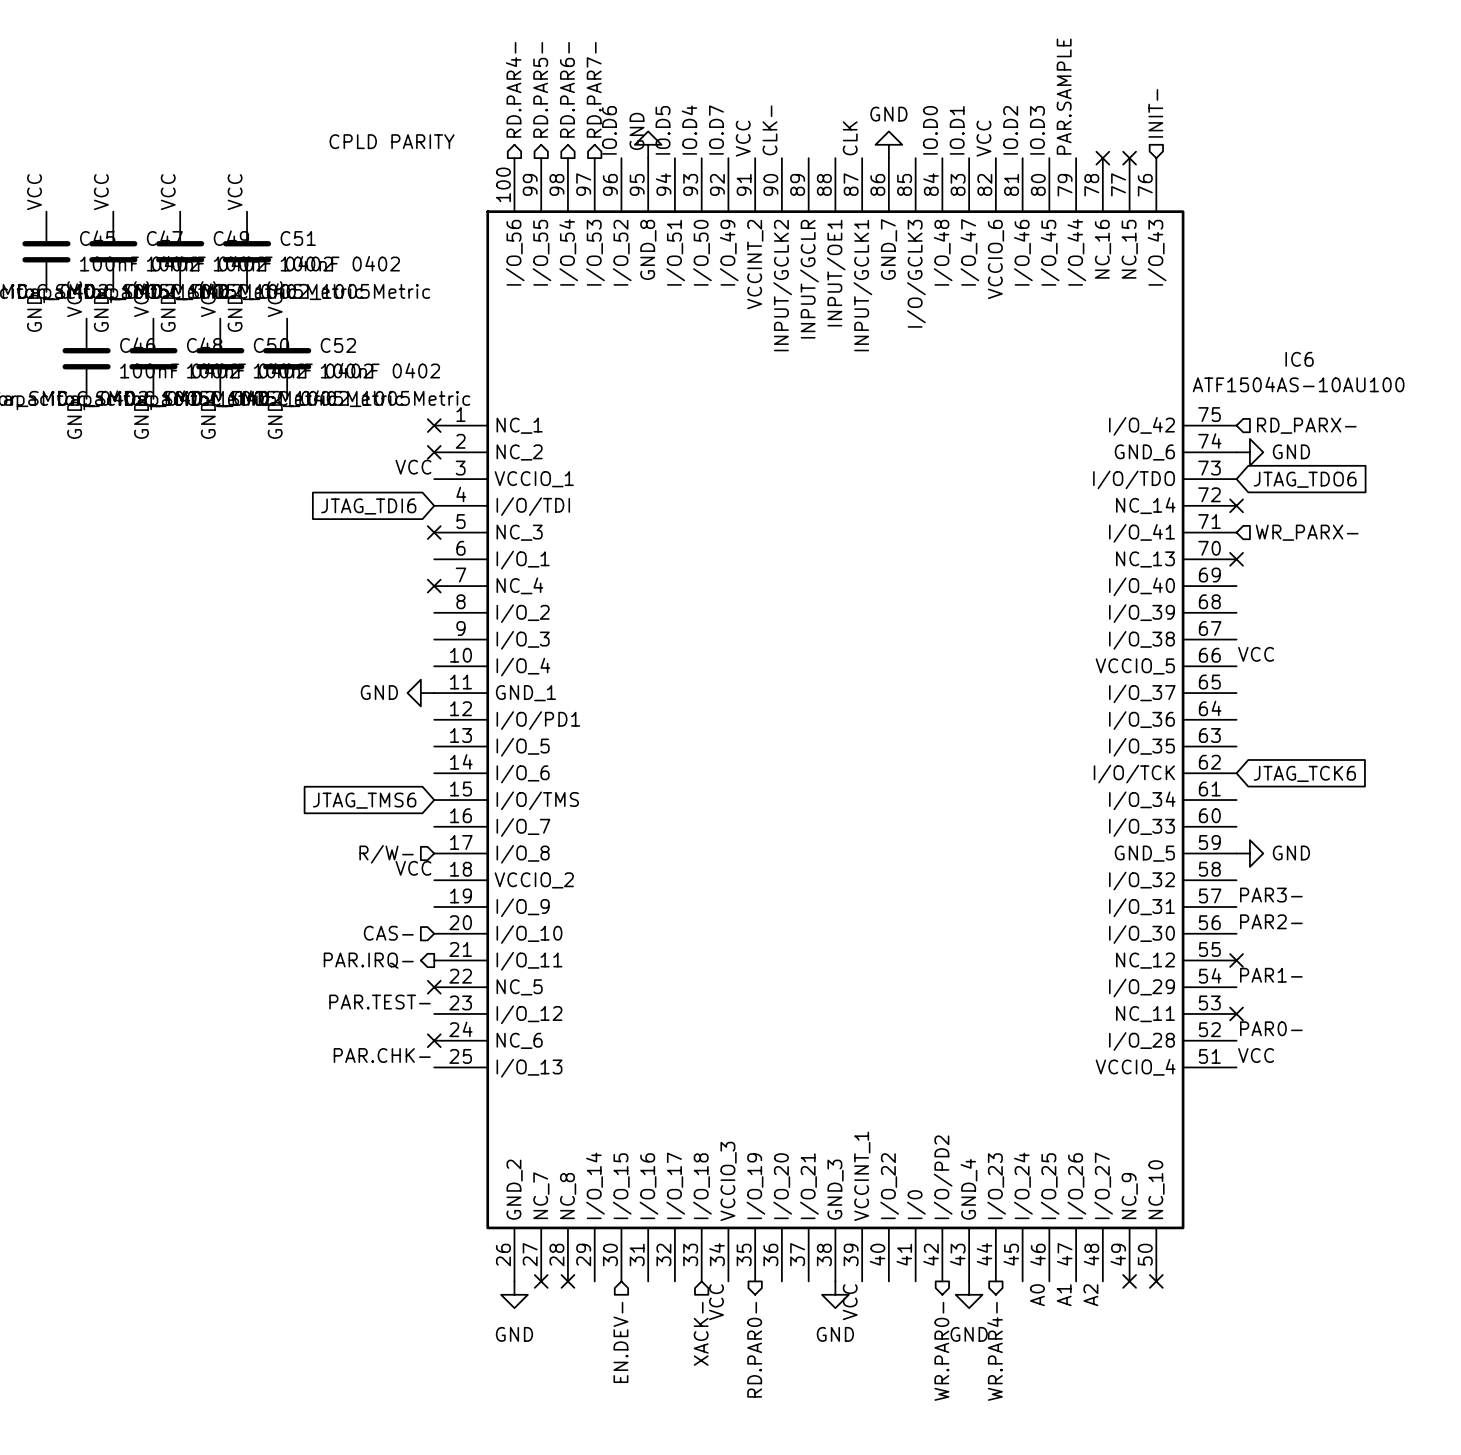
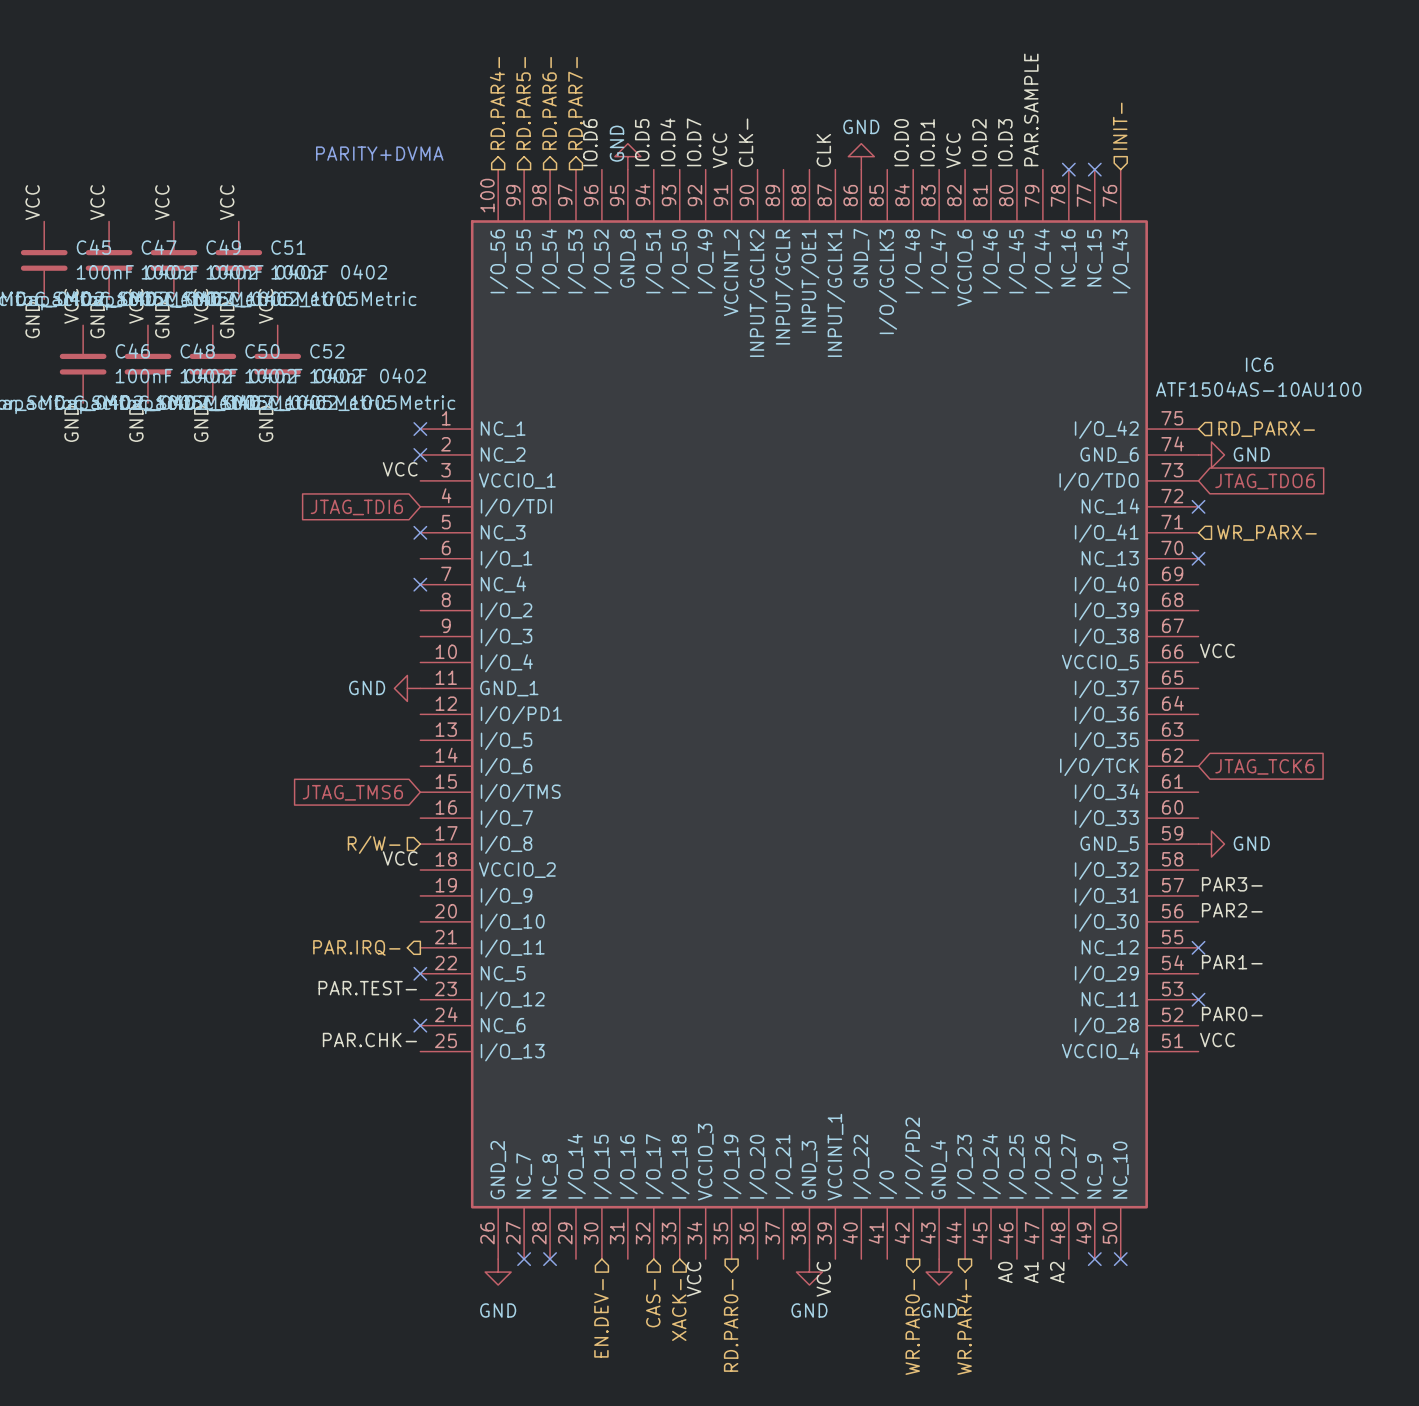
text: CPLD PARITY (392, 141) -> PARITY+DVMA (379, 153)
hierarchical label: CAS- (388, 933) -> none
hierarchical label: none -> CAS- (653, 1303)

